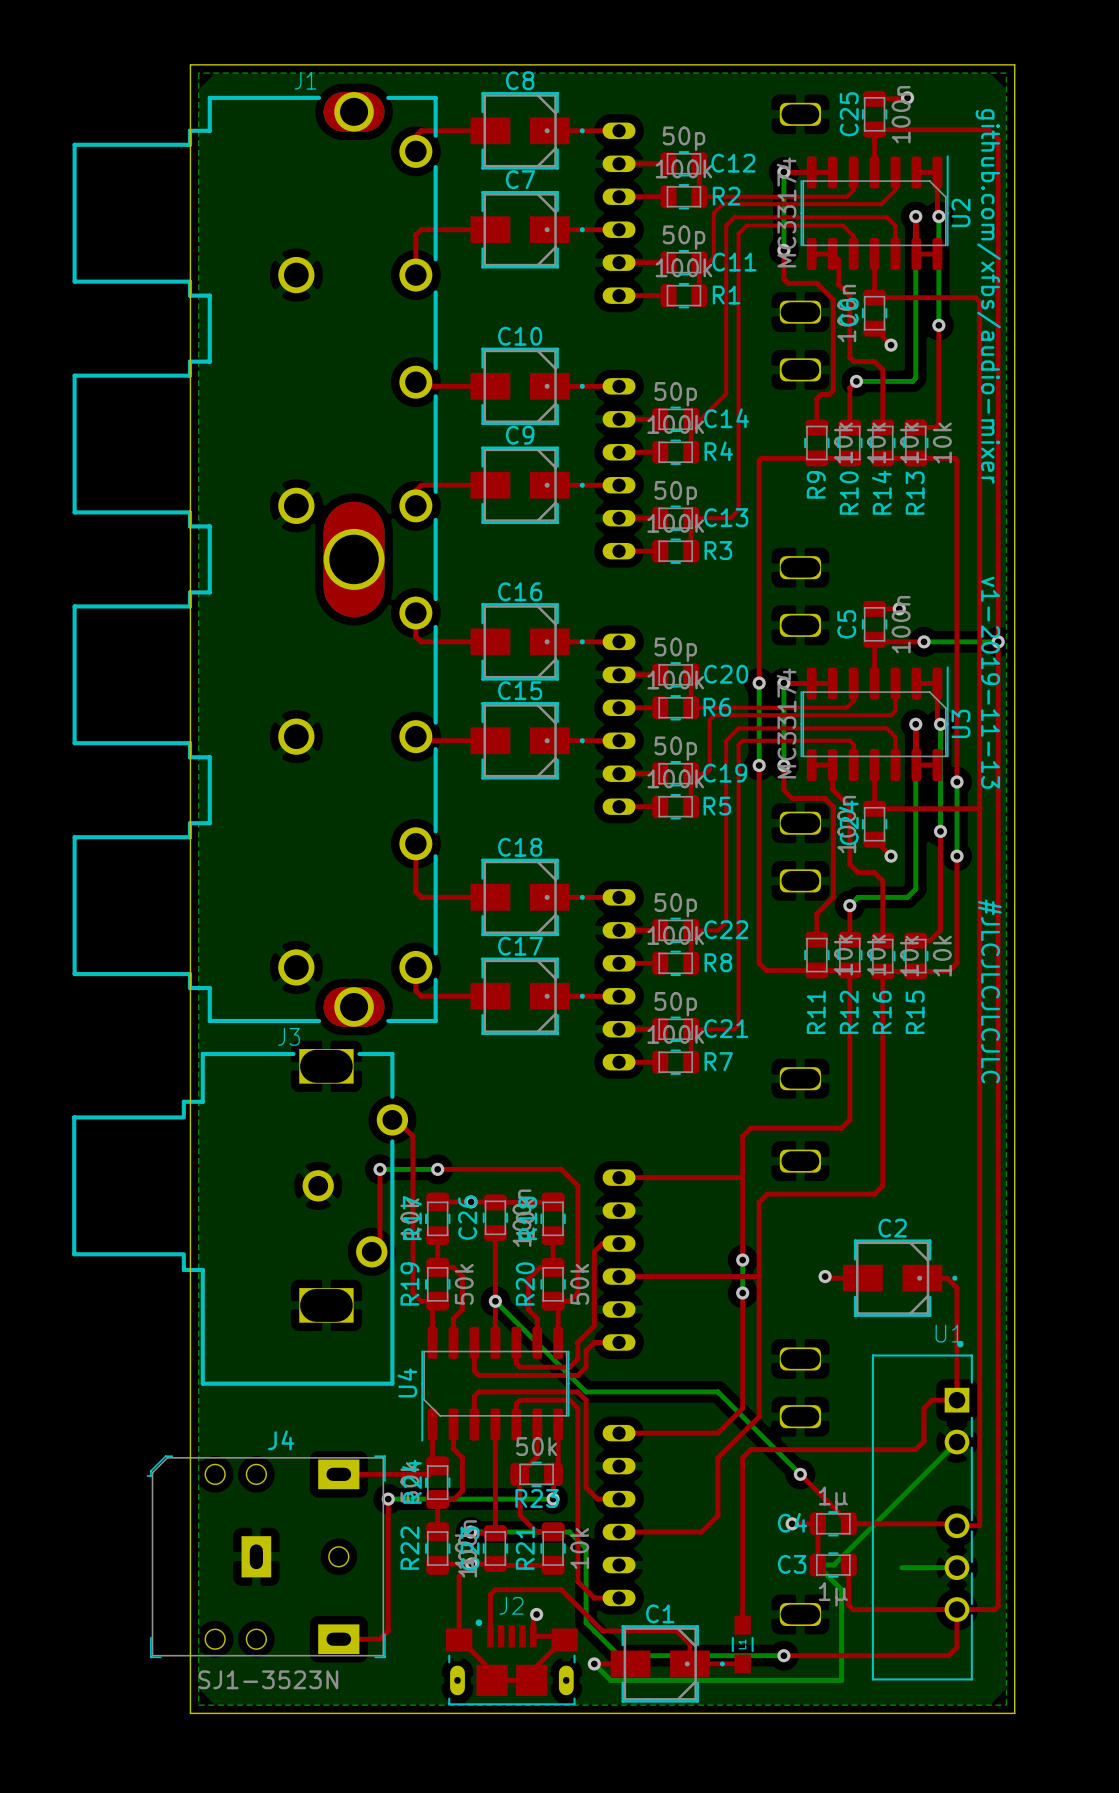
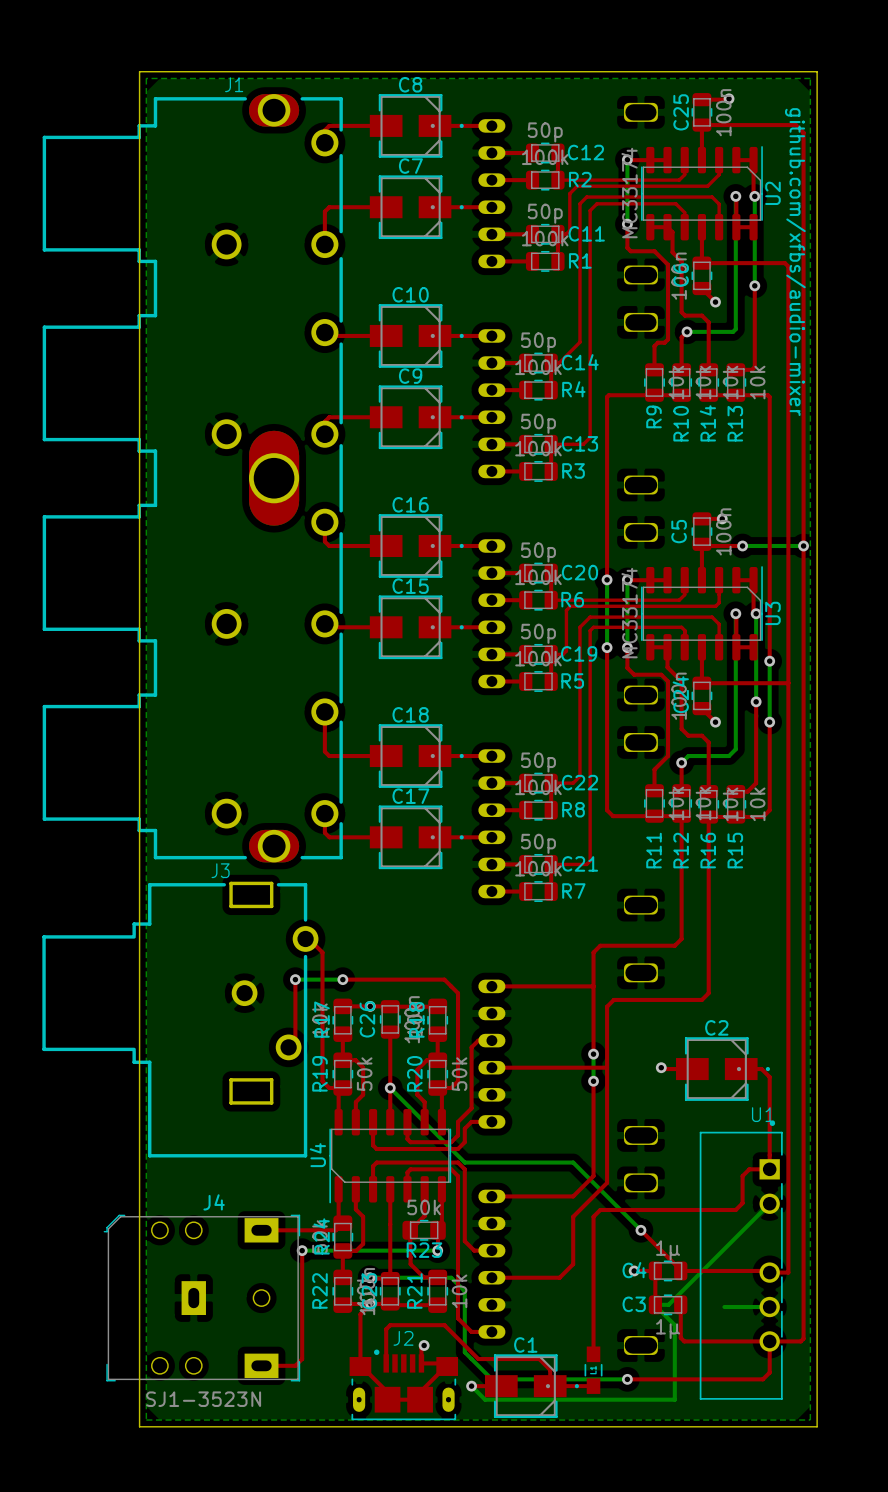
text: v1-2019-11-13 (990, 682) -> none
text: #JLCJLCJLCJLC (989, 991) -> none
J3 footprint: [72, 1049, 409, 1386] -> [42, 881, 319, 1158]

